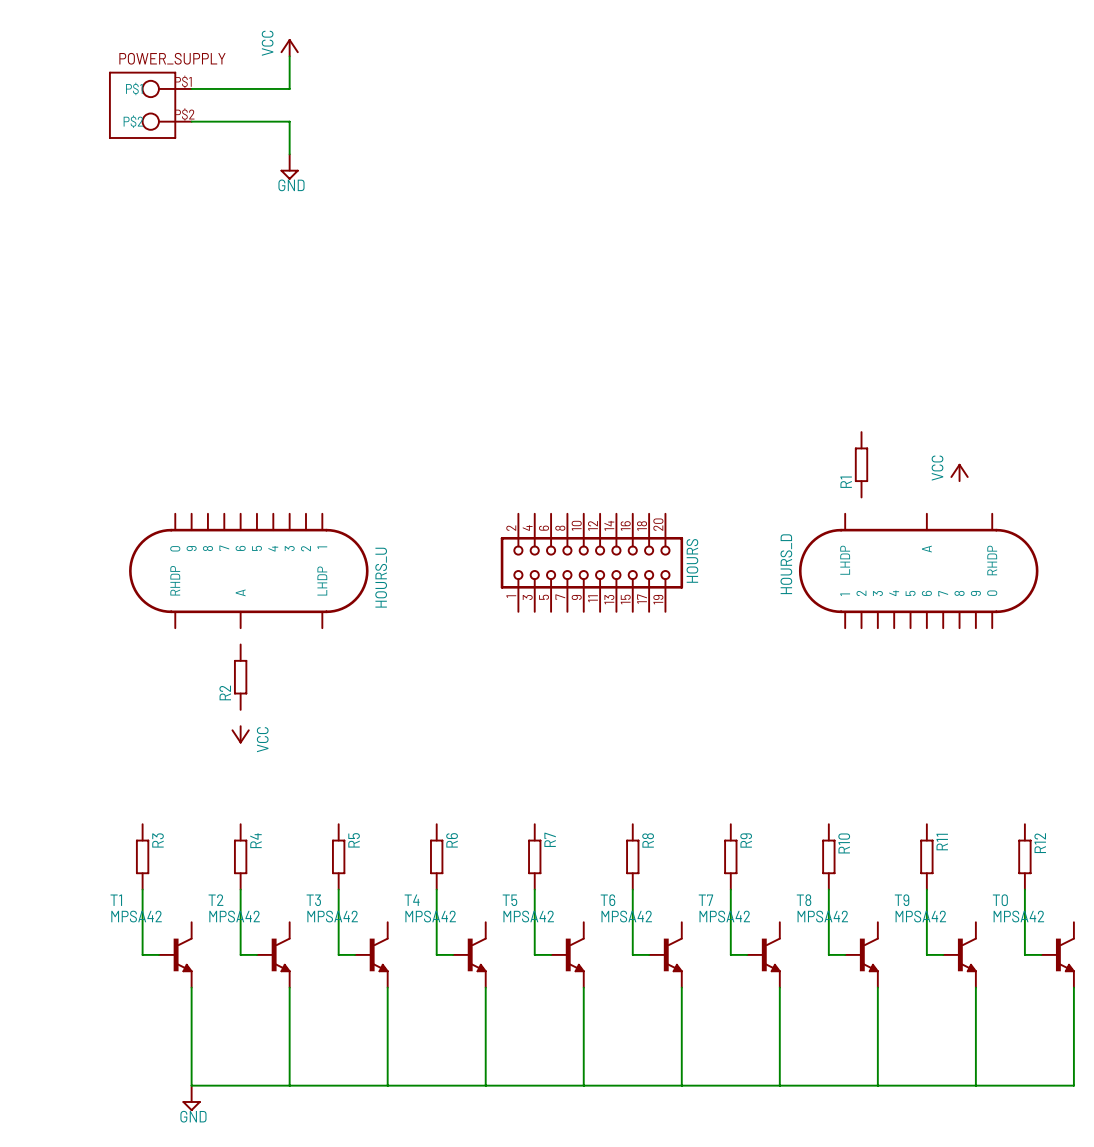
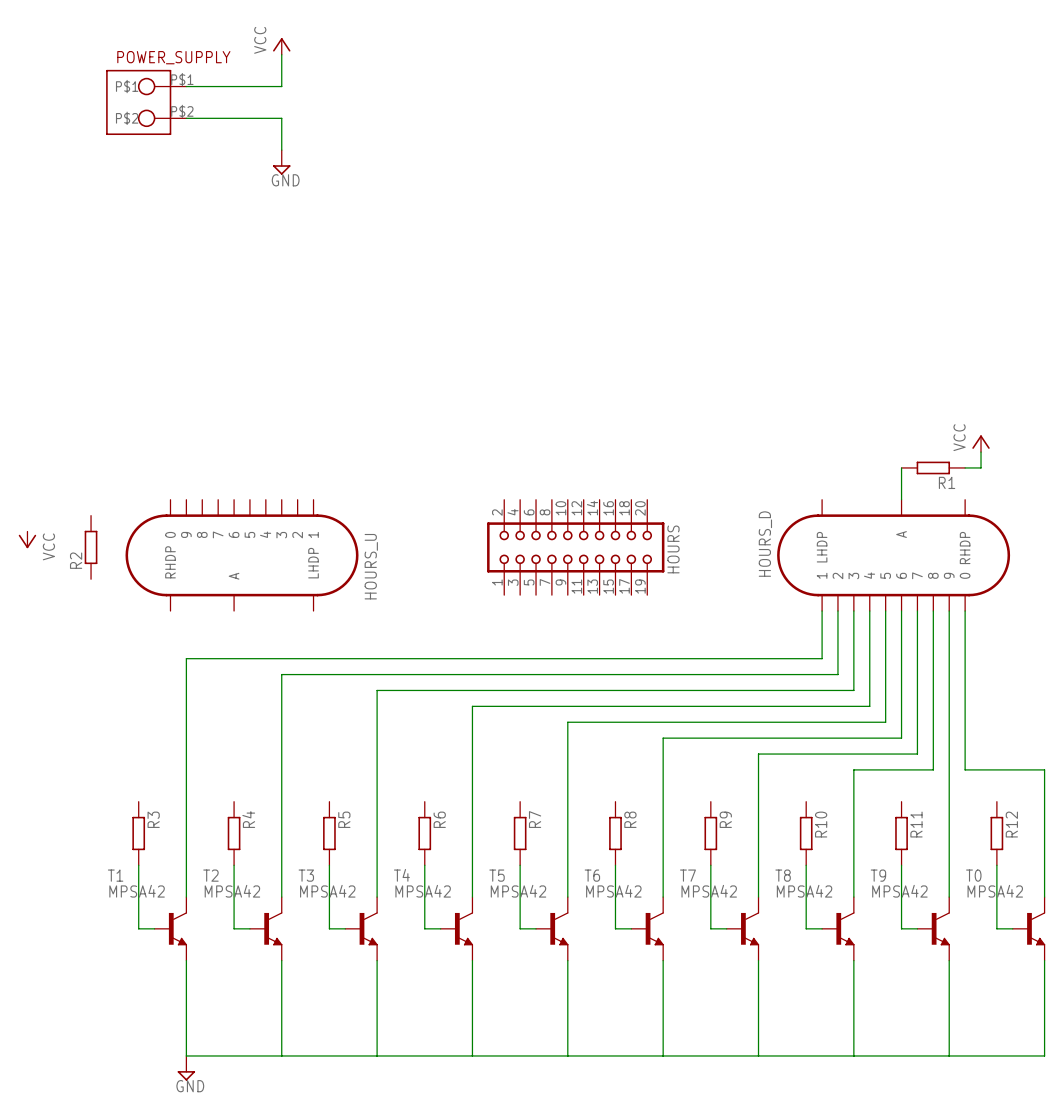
R1 rotation: 0° (861, 464) -> 90° clockwise (933, 467)
R1 position: (861, 464) -> (933, 467)
wire: none -> (981, 452) (981, 467) (965, 467)
power symbol position: VCC (959, 472) -> VCC (981, 443)
wire: none -> (901, 467) (901, 499)
R1 name position: R1 (846, 482) -> R1 (947, 482)
power symbol: none -> VCC (27, 539)
wire: none -> (822, 611) (822, 658) (186, 658) (186, 897)
wire: none -> (837, 611) (837, 674) (281, 674) (281, 897)
wire: none -> (853, 611) (853, 690) (377, 690) (377, 897)
wire: none -> (869, 611) (869, 706) (472, 706) (472, 897)
wire: none -> (885, 611) (885, 722) (567, 722) (567, 897)
wire: none -> (901, 611) (901, 738) (663, 738) (663, 897)
wire: none -> (917, 611) (917, 754) (758, 754) (758, 897)
wire: none -> (933, 611) (933, 769) (853, 769) (853, 897)
wire: none -> (949, 611) (949, 897)
wire: none -> (965, 611) (965, 769) (1044, 769) (1044, 897)
R2 position: (240, 677) -> (91, 547)
power symbol: VCC (240, 734) -> none

